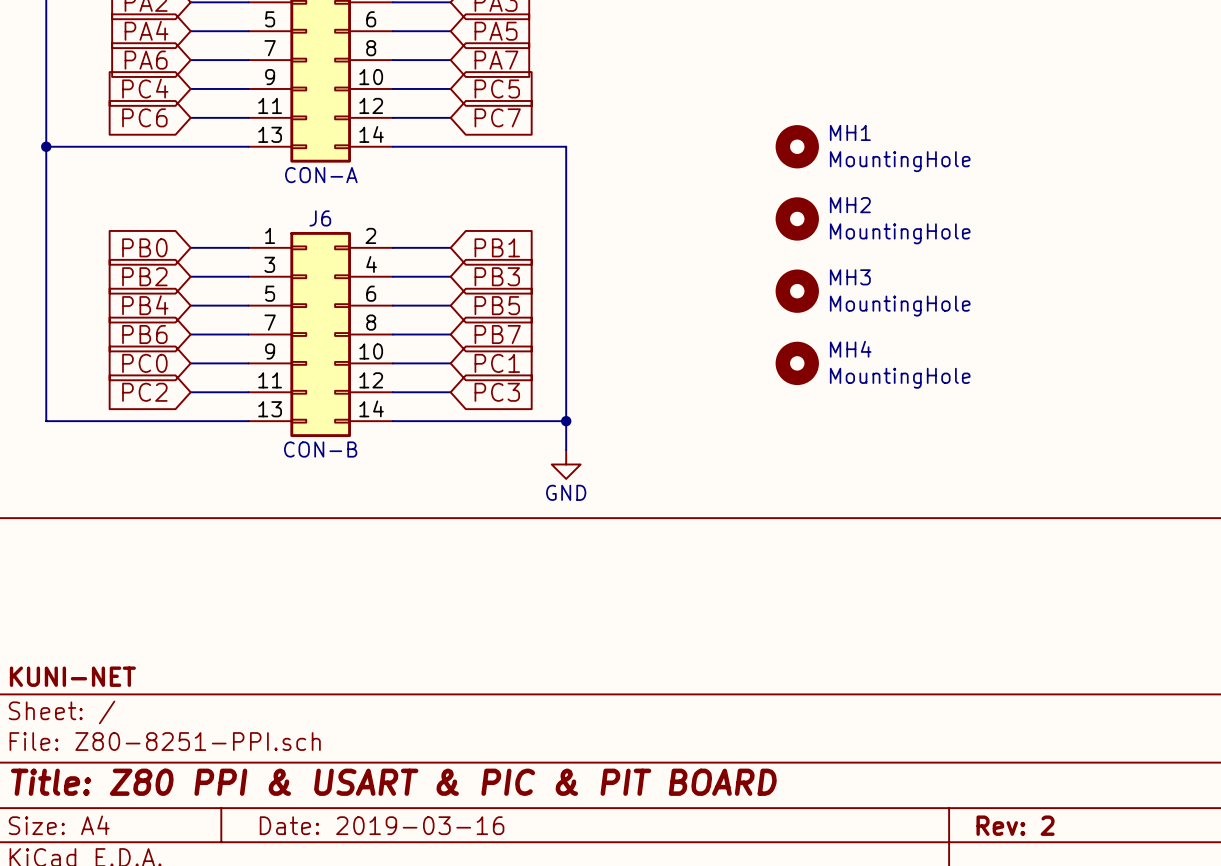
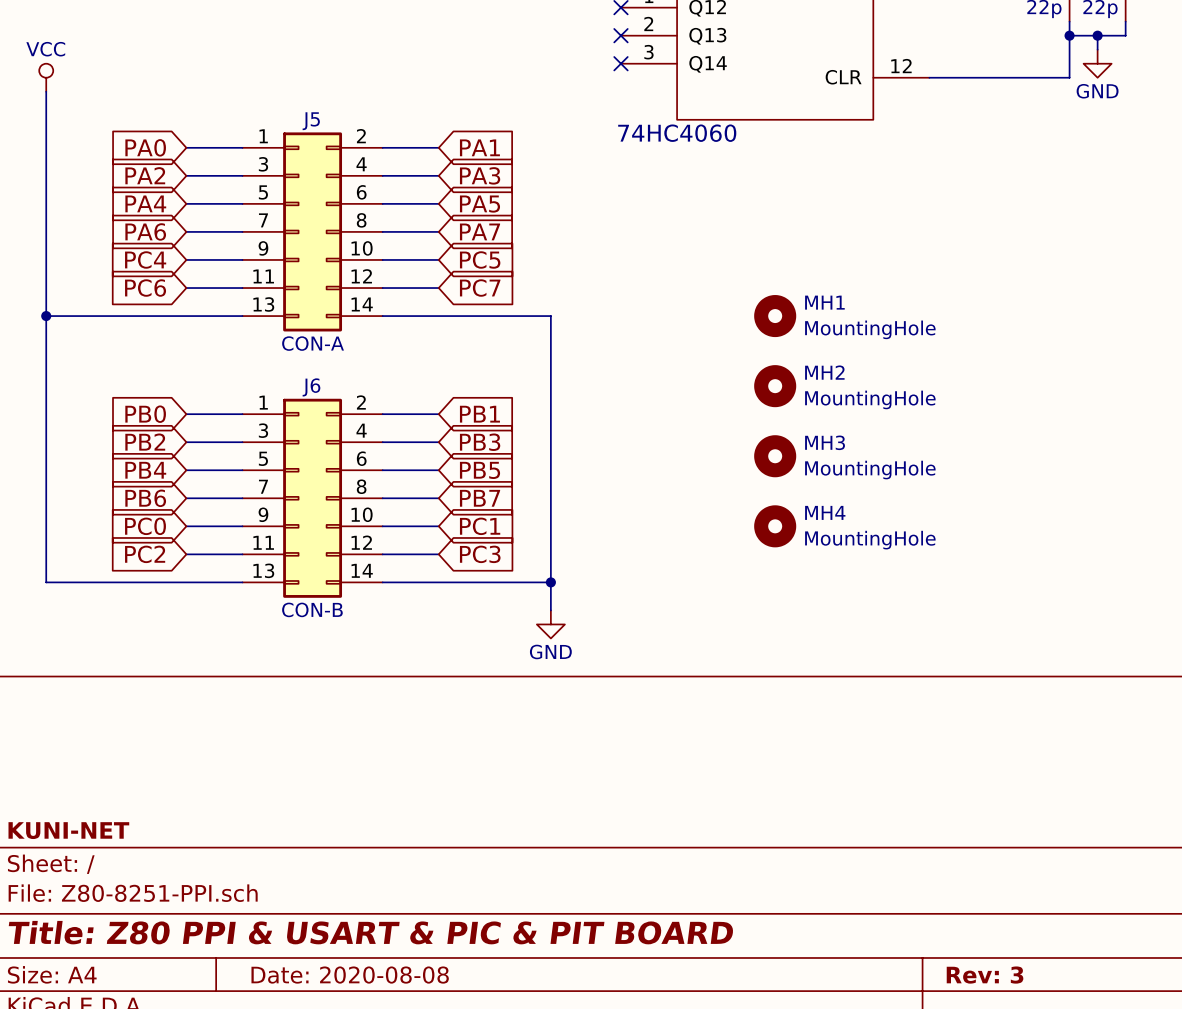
title block: Date: 2019-03-16 (382, 825) -> Date: 2020-08-08 (350, 975)
title block: Rev: 2 (1015, 825) -> Rev: 3 (985, 975)

